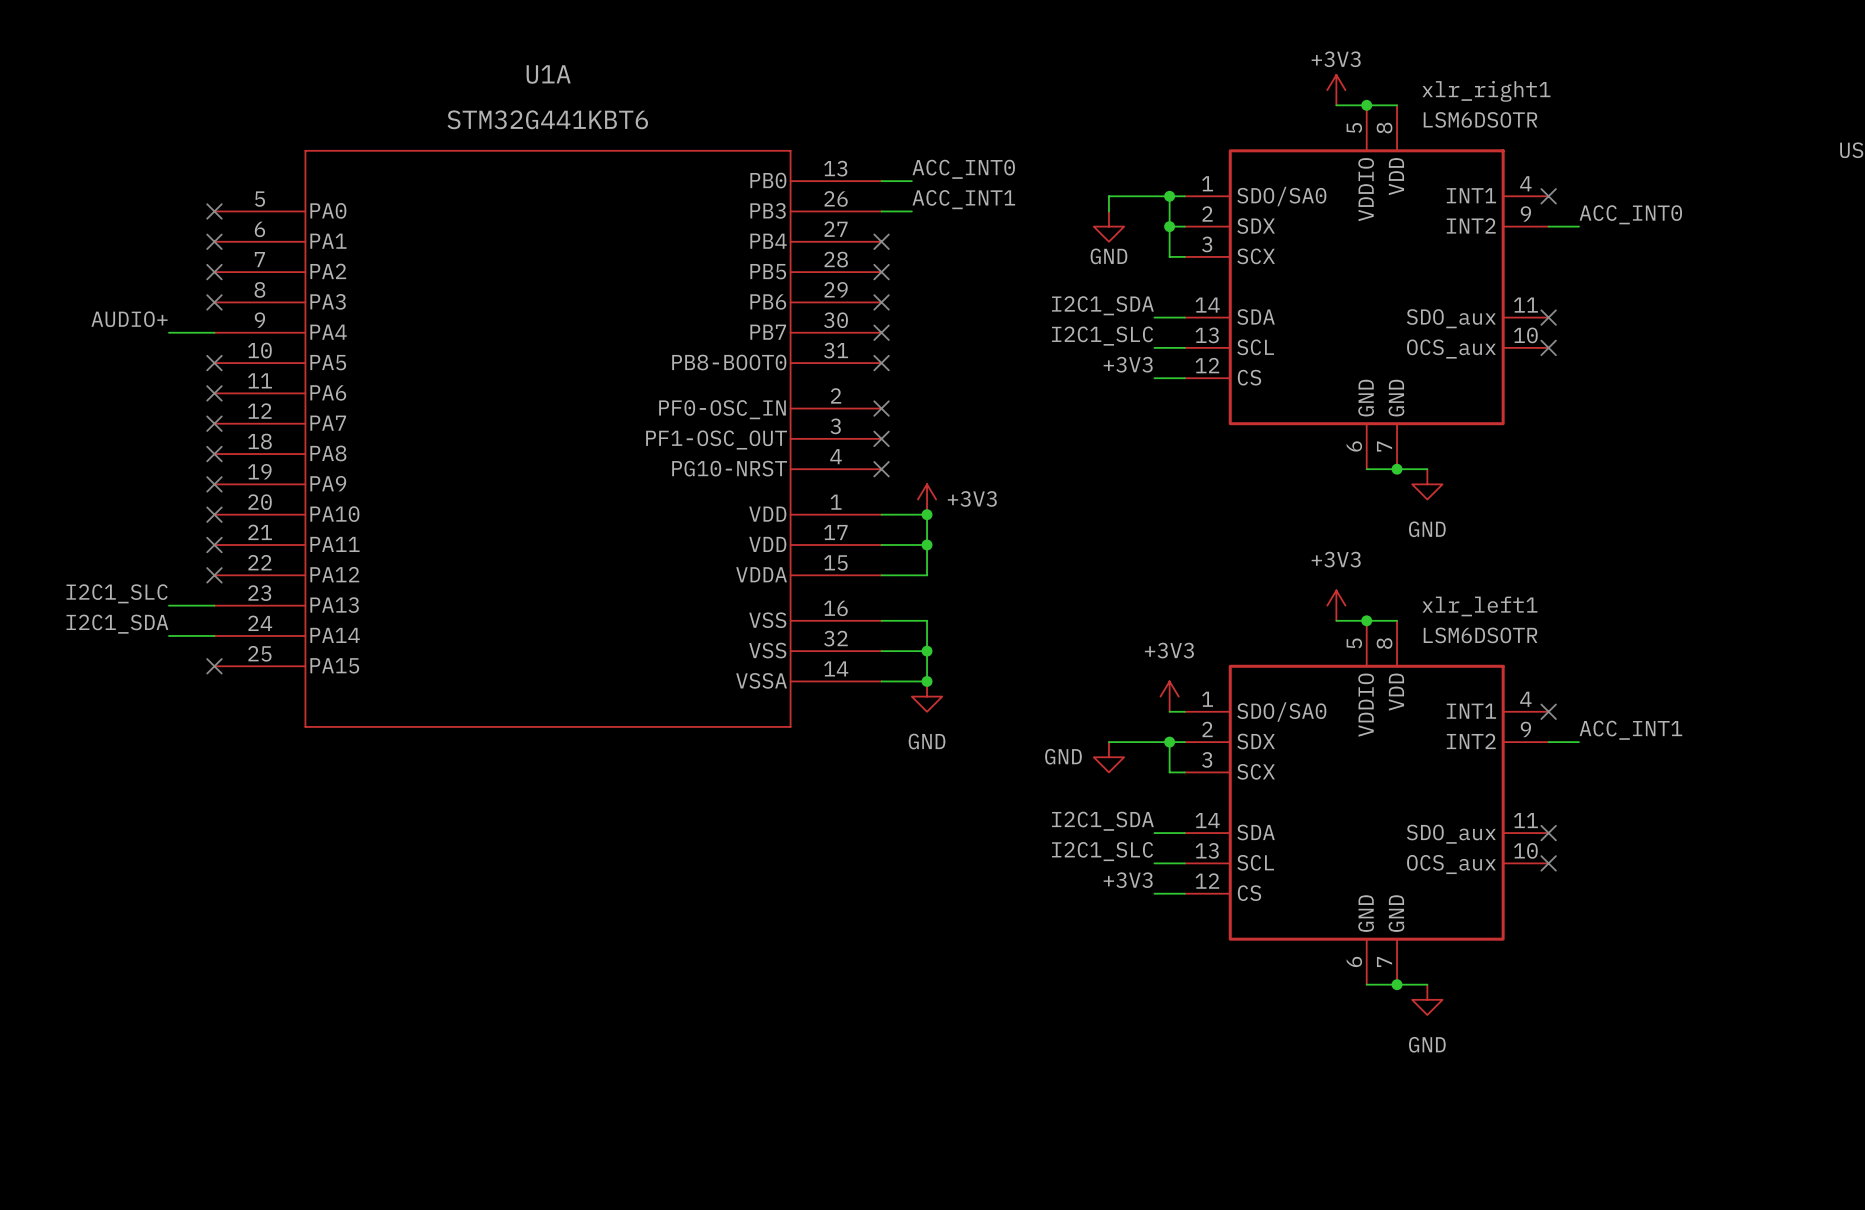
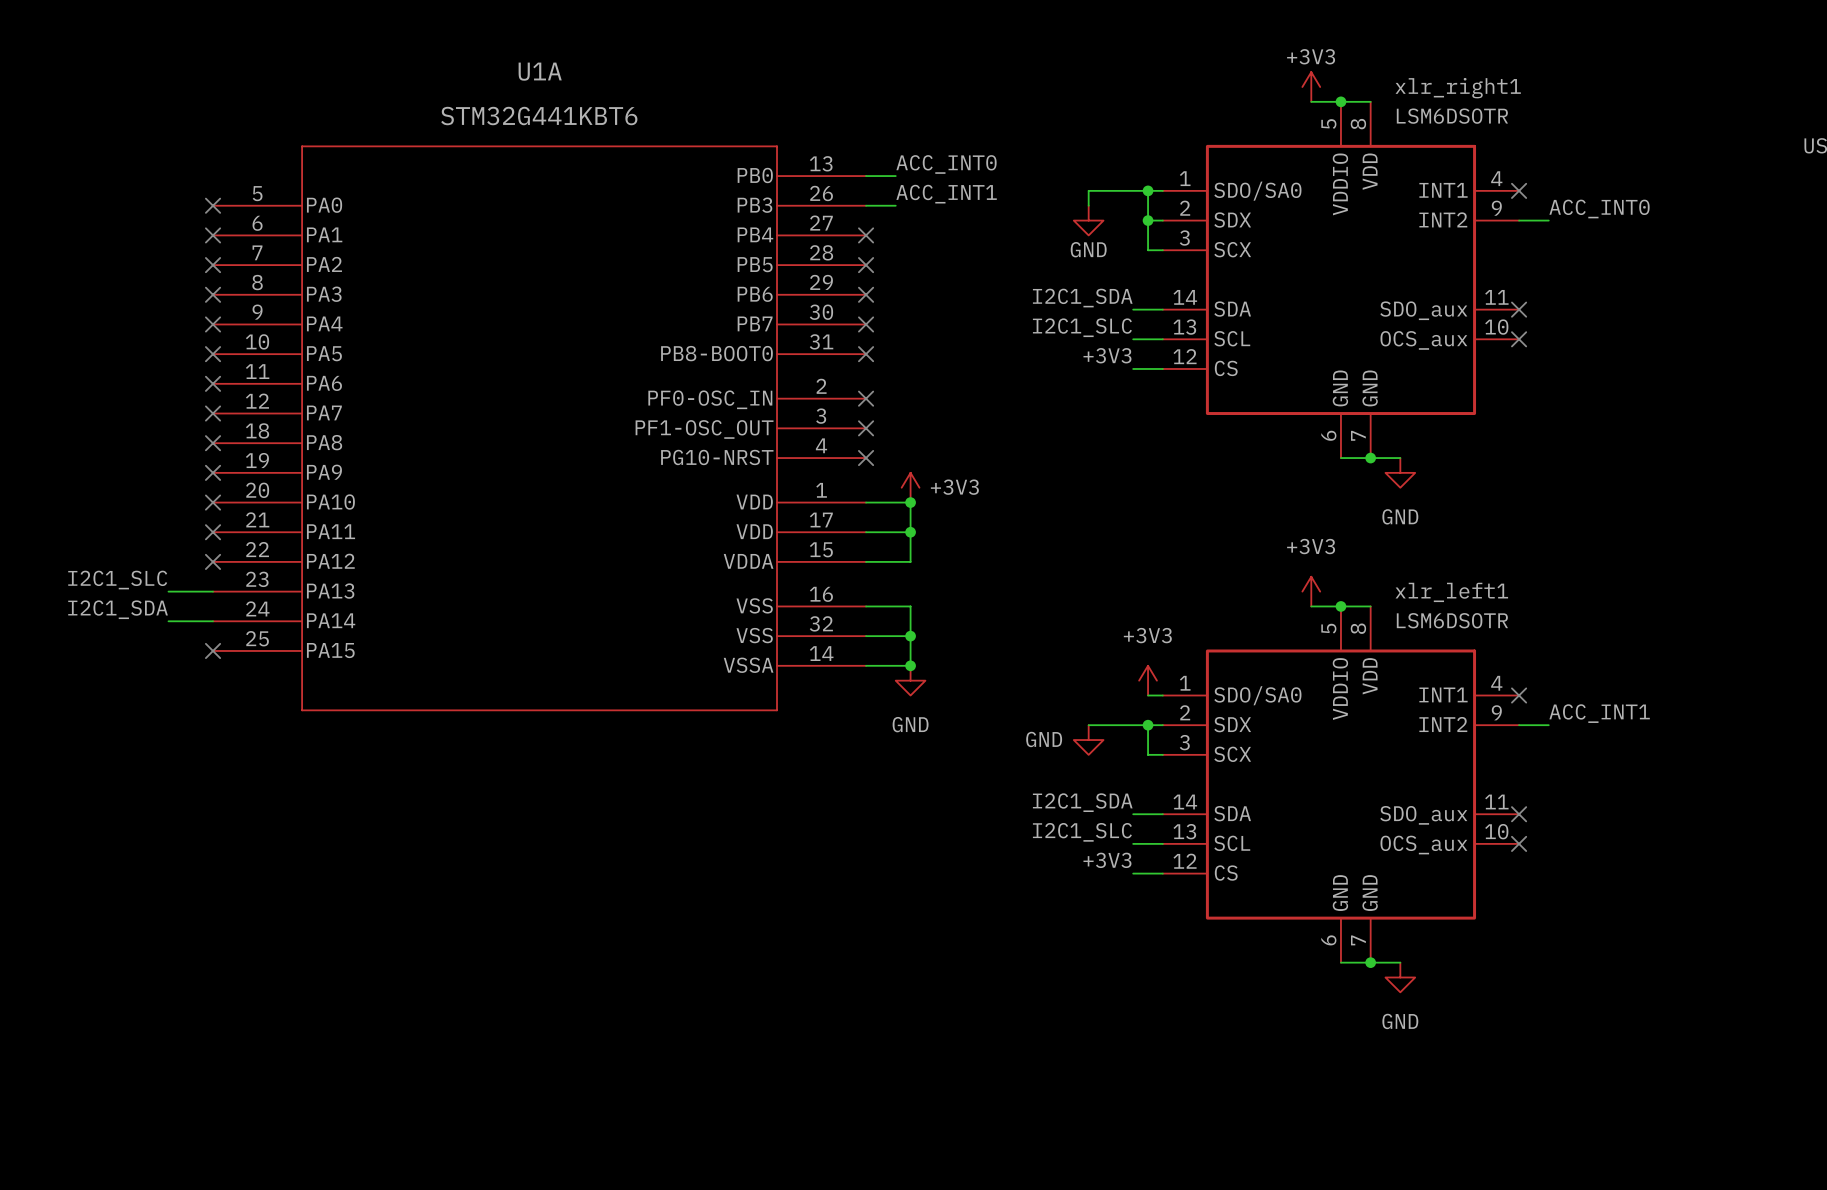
label: AUDIO+ (129, 319) -> none
wire: (168, 332) (214, 332) -> none
no-connect mark: none -> (213, 324)

